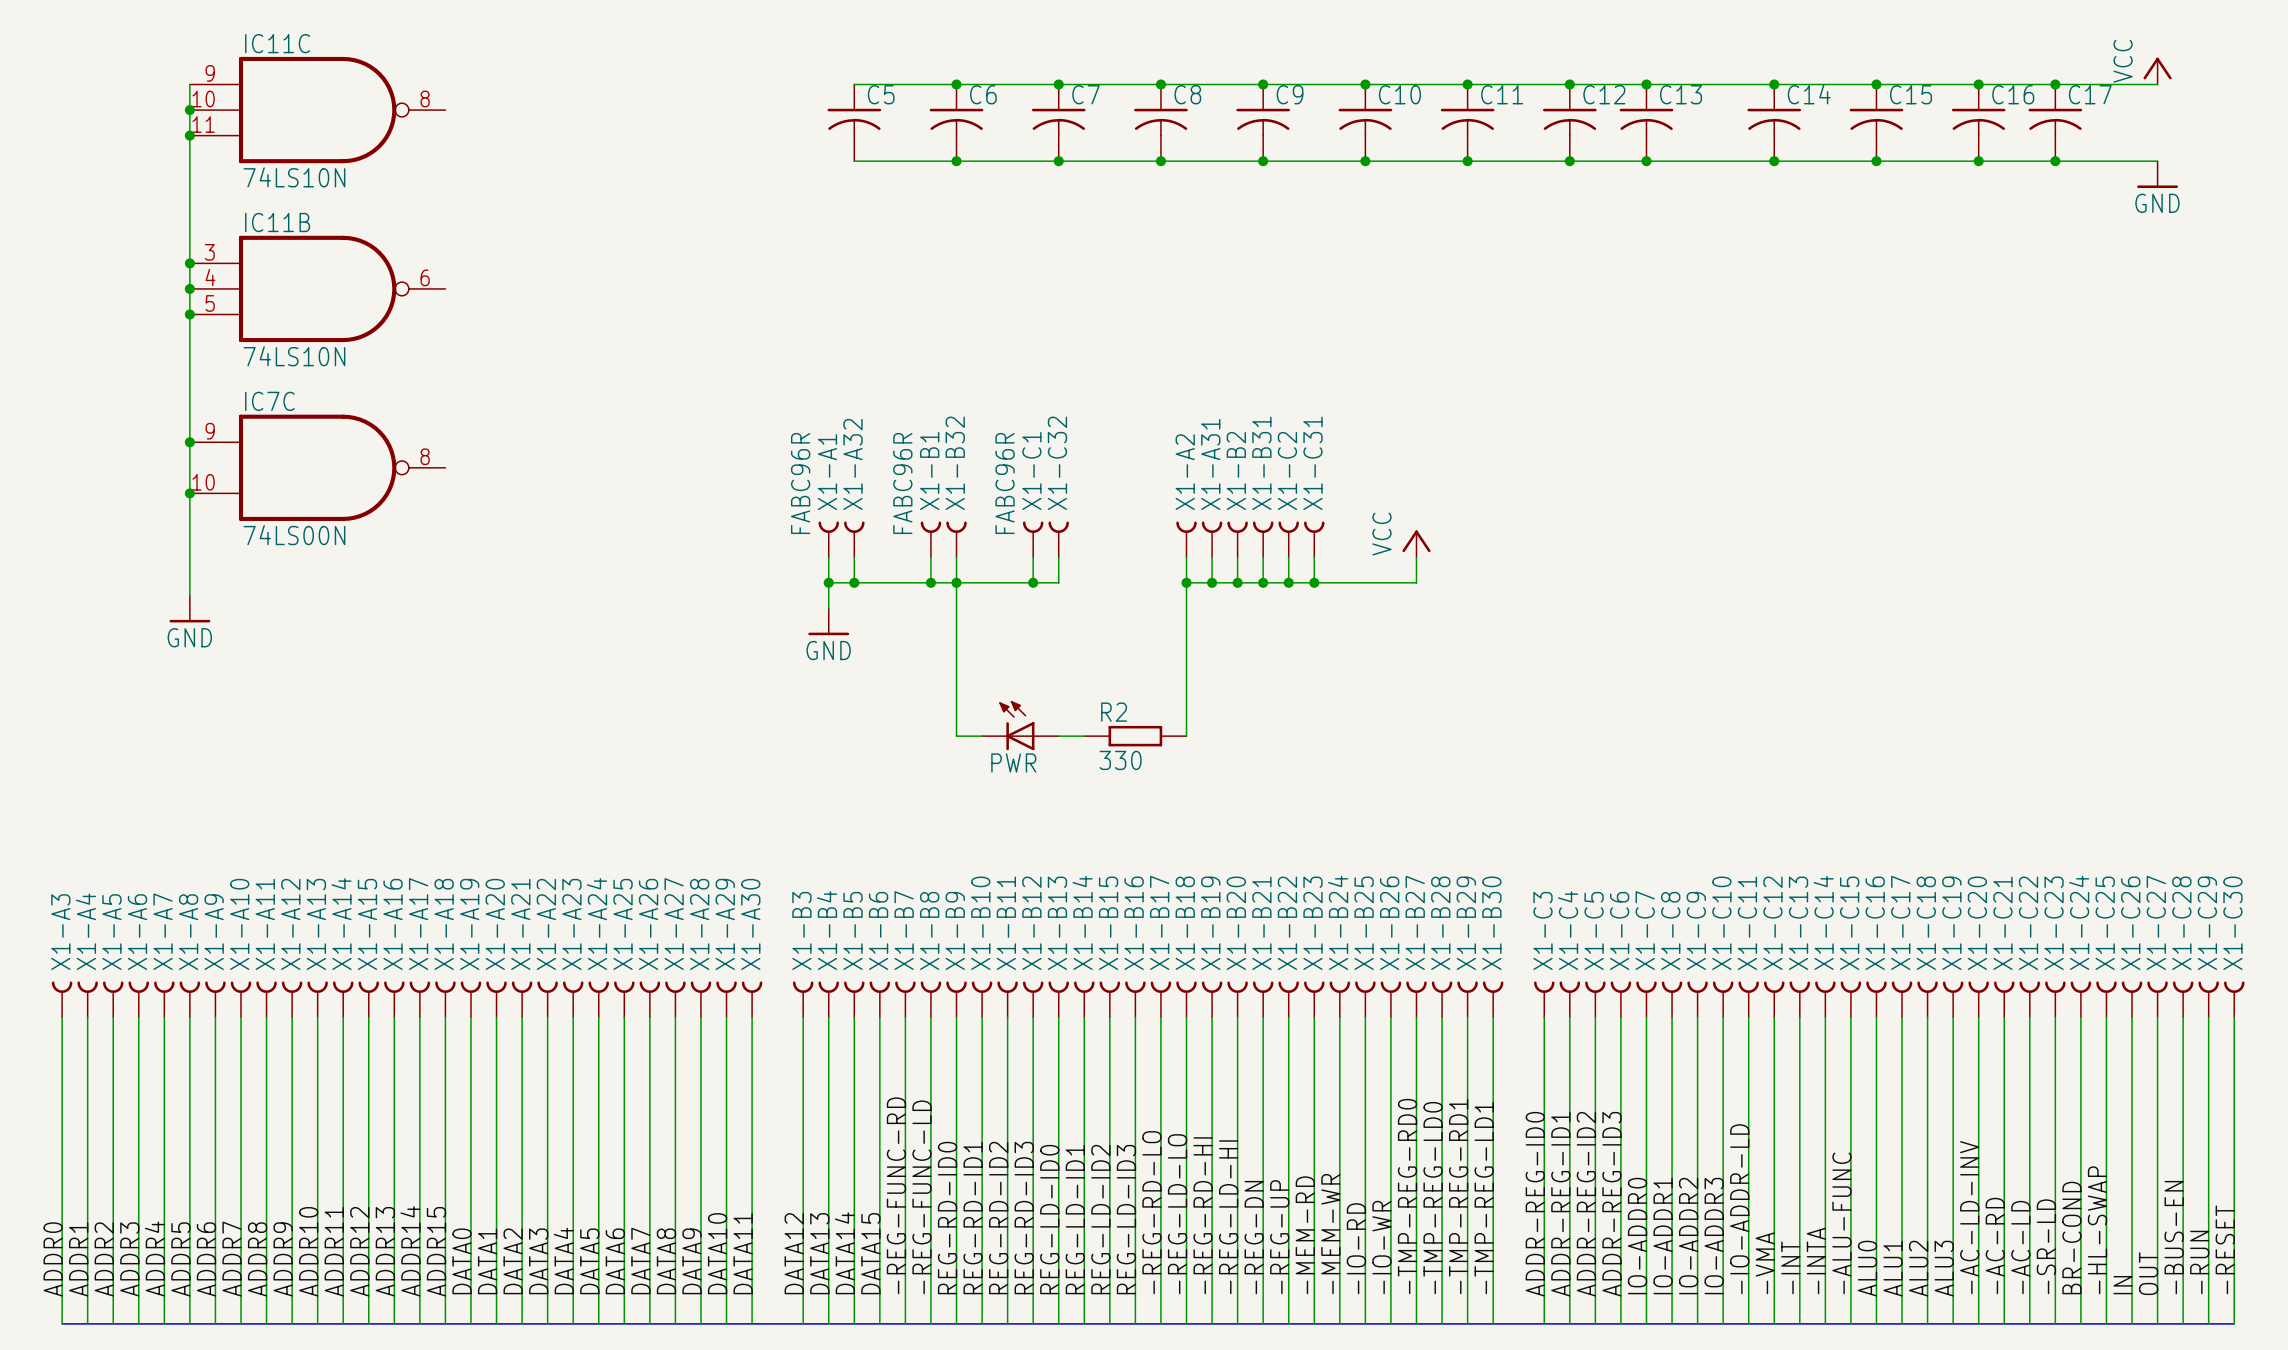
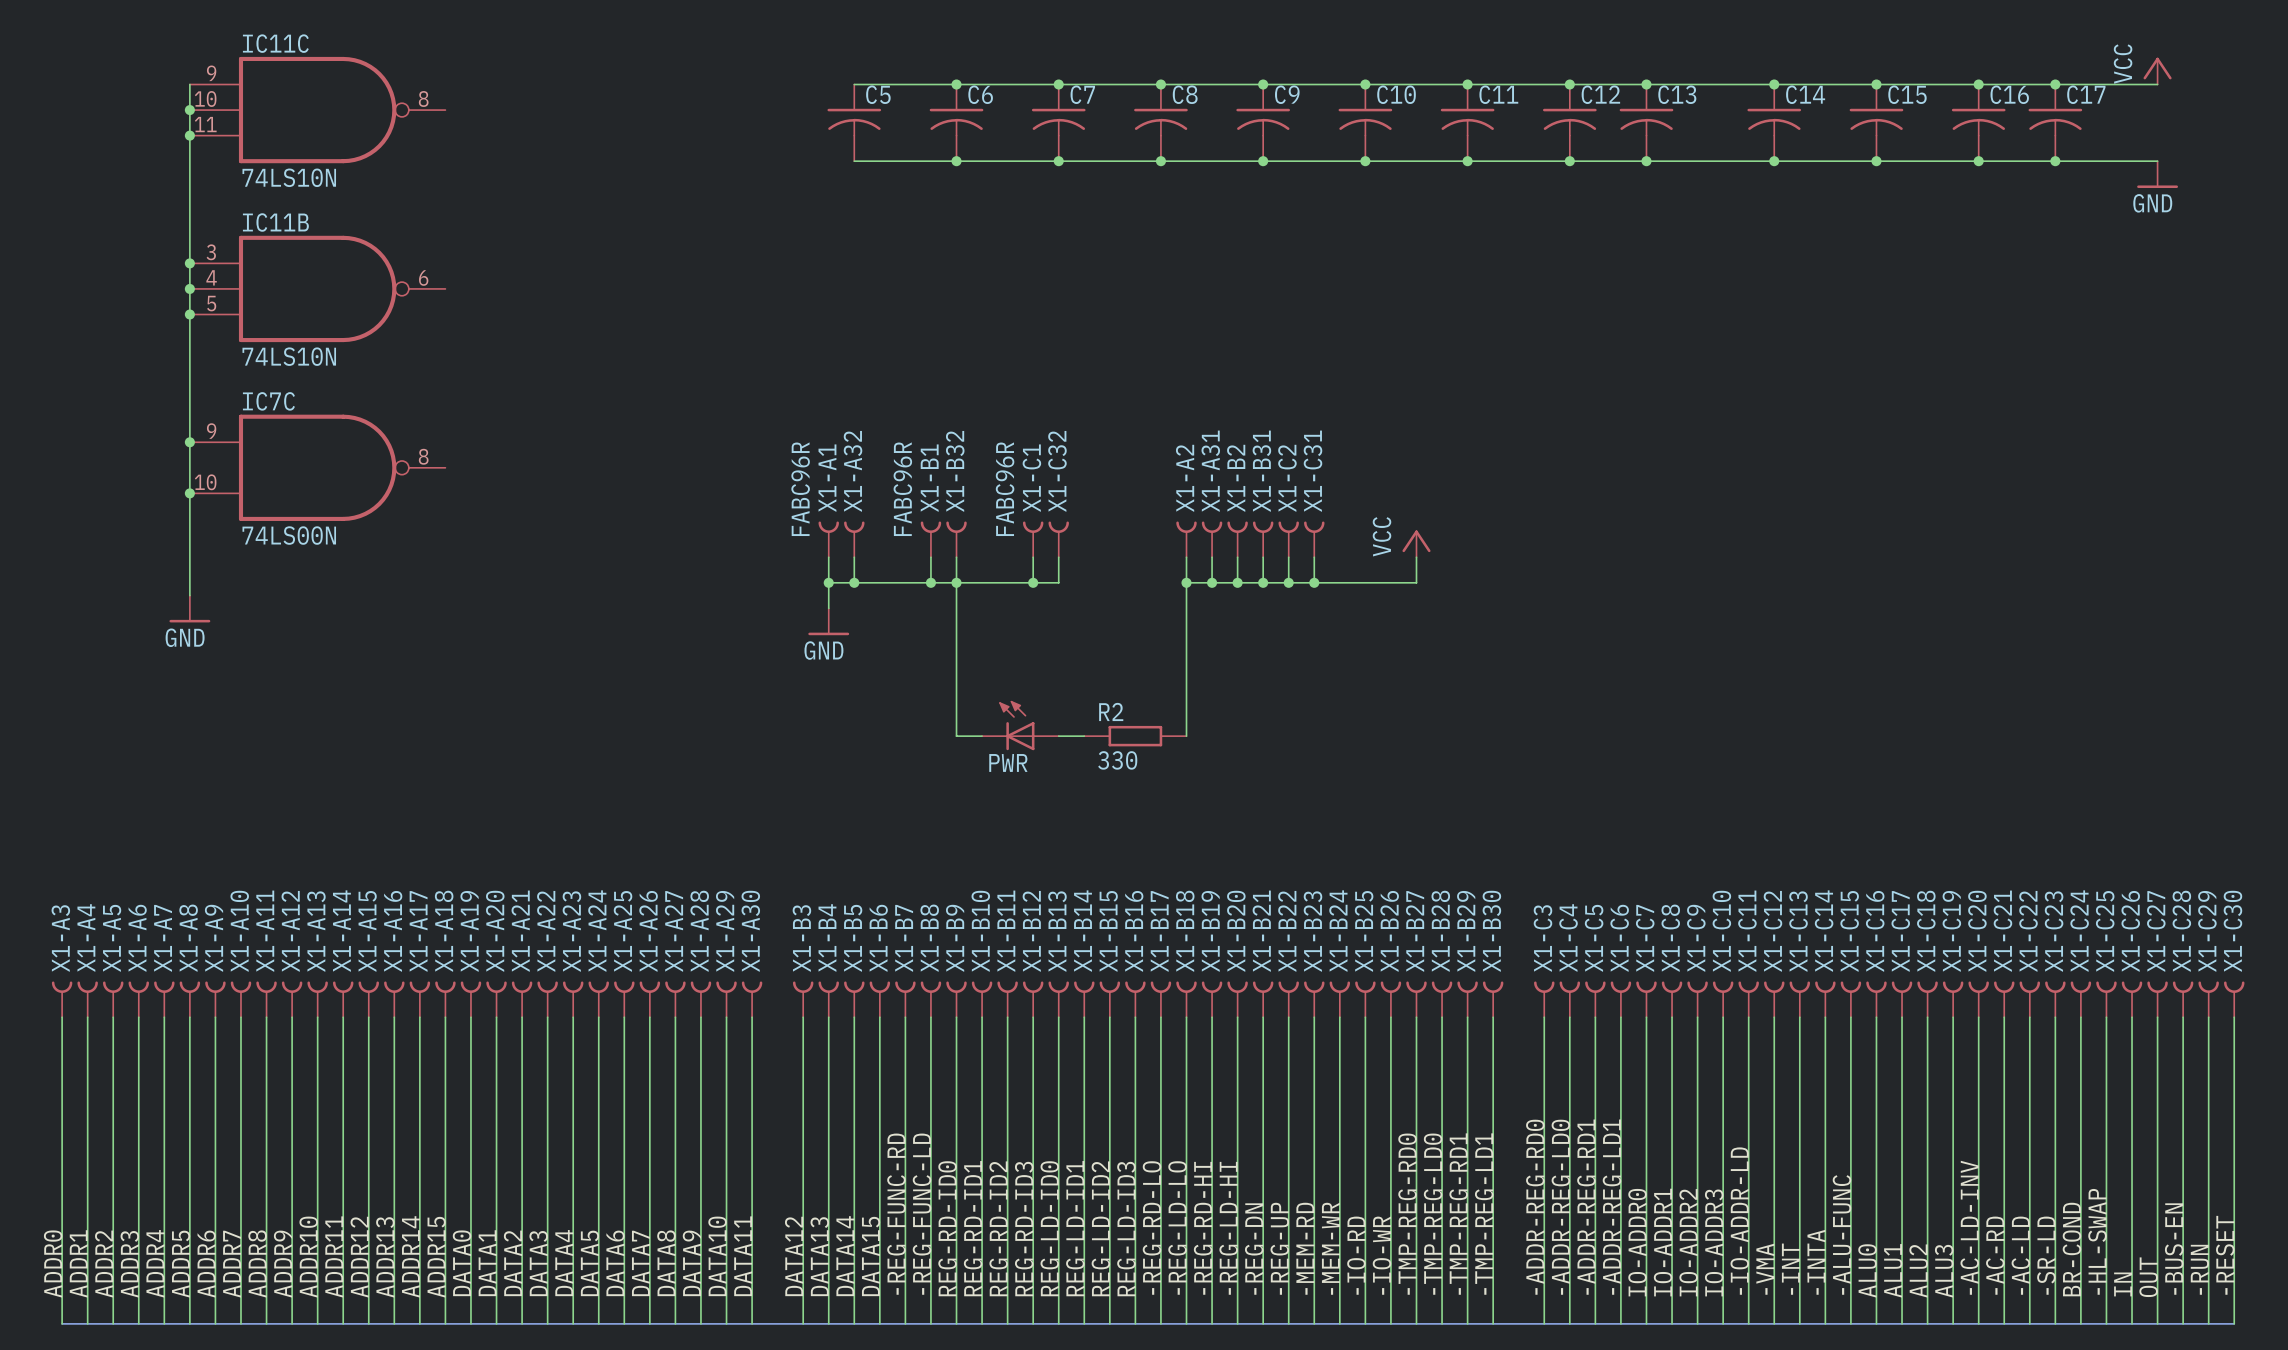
label: ADDR-REG-ID0 (1535, 1204) -> -ADDR-REG-RD0 (1535, 1207)
label: ADDR-REG-ID1 (1560, 1204) -> -ADDR-REG-LD0 (1560, 1207)
label: ADDR-REG-ID2 (1586, 1204) -> -ADDR-REG-RD1 (1586, 1207)
label: ADDR-REG-ID3 (1611, 1204) -> -ADDR-REG-LD1 (1611, 1207)

